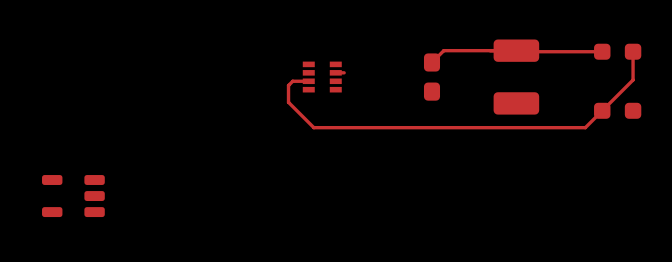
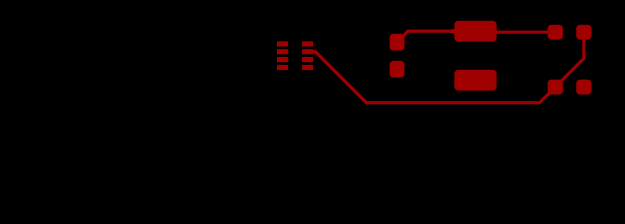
top track: (309, 81) (292, 81) (288, 85) (288, 102) (313, 127) (399, 127) -> (315, 51) (366, 102)
part: (73, 196) -> none

